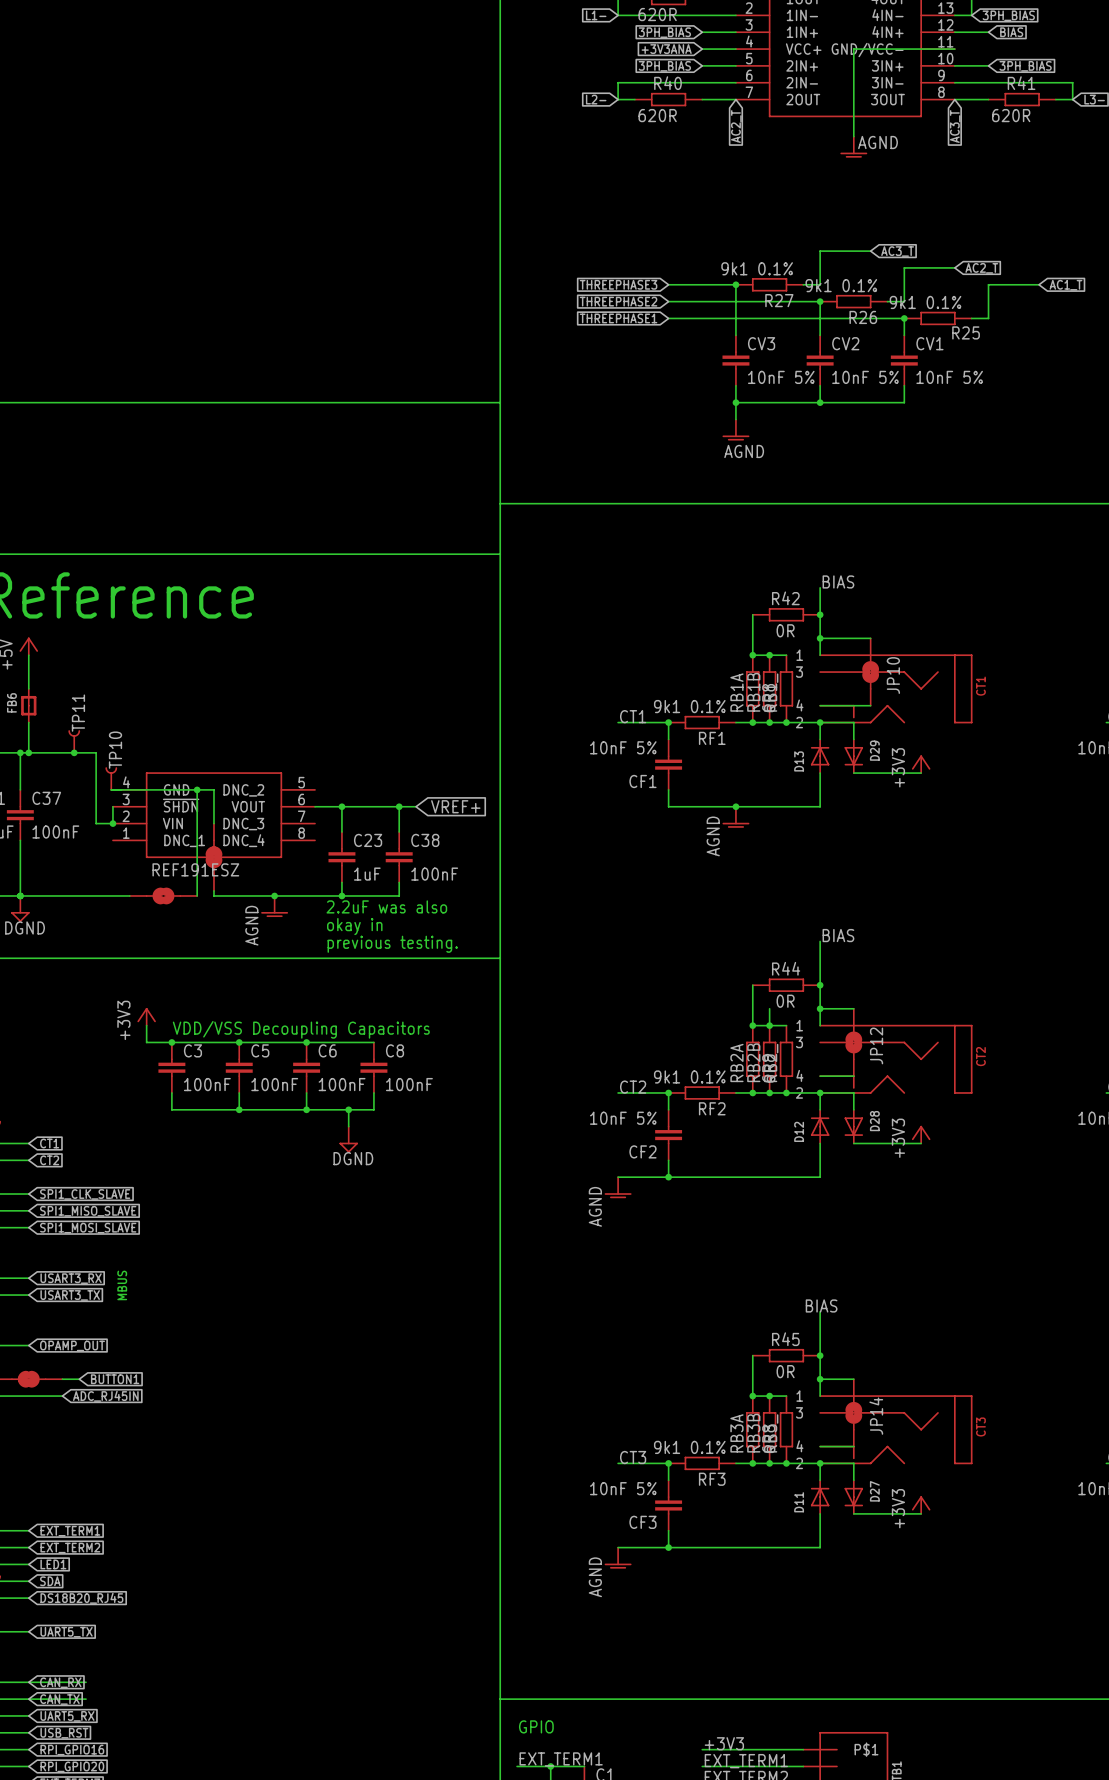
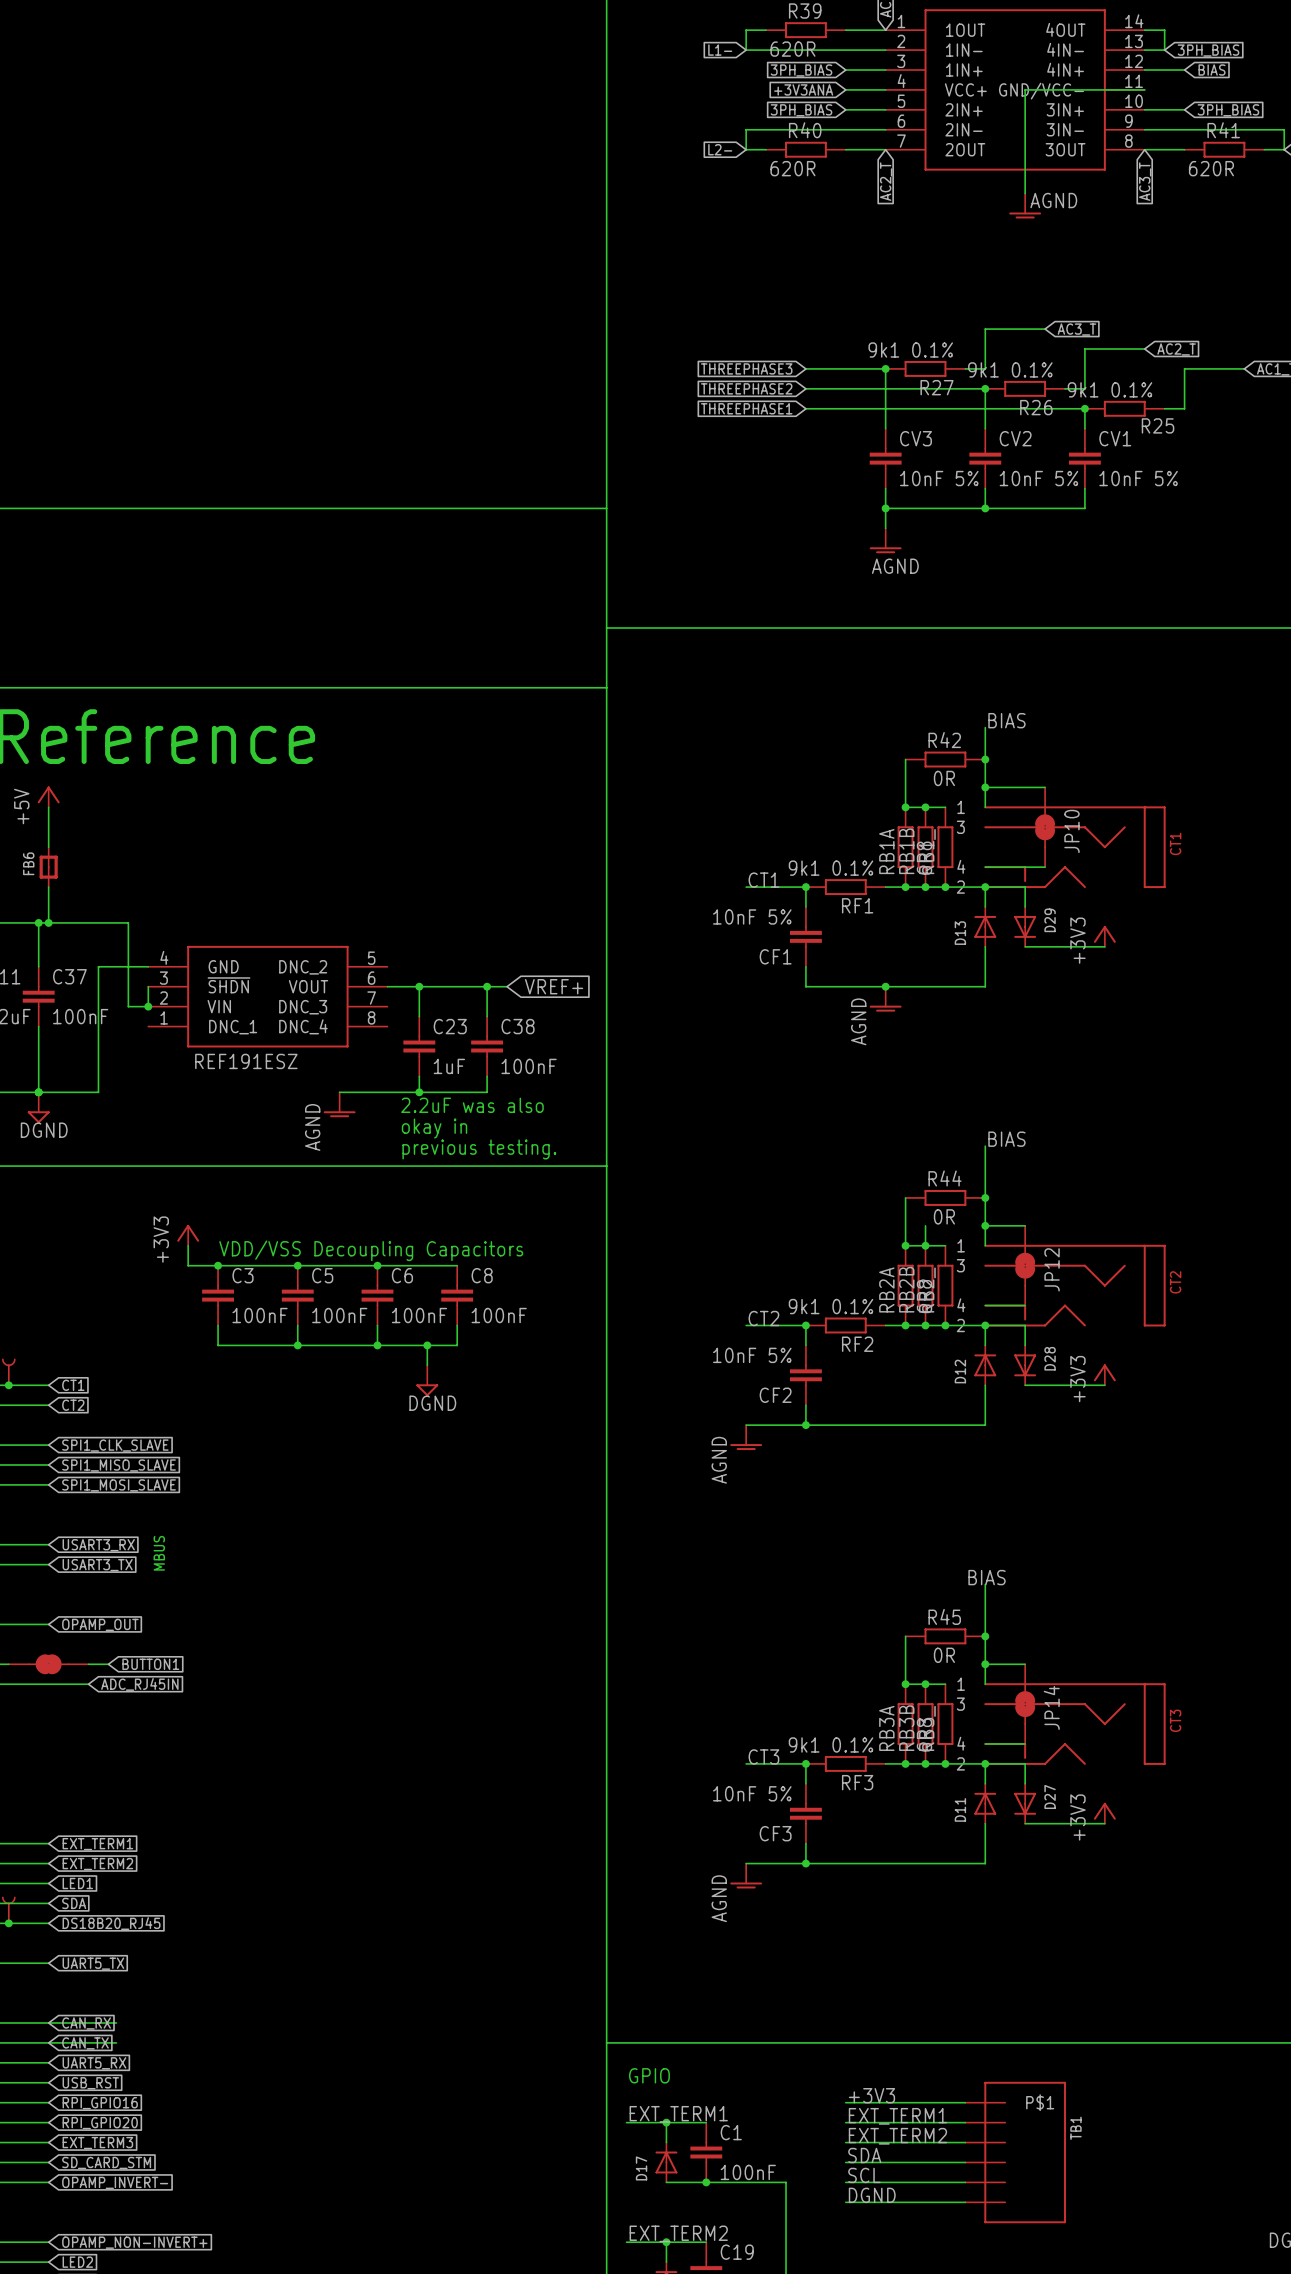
TP11: (74, 741) -> none
junction: (74, 752) -> none
TP10: (111, 778) -> none
wire: (112, 789) (213, 789) (213, 823) -> none
wire: (197, 789) (197, 895) -> none
junction: (197, 789) -> none
part: (213, 857) -> none
wire: (213, 890) (213, 895) (274, 895) -> none
wire: (70, 895) (129, 895) -> (98, 1092) (98, 966) (146, 966)
part: (163, 895) -> none
junction: (274, 895) -> none

